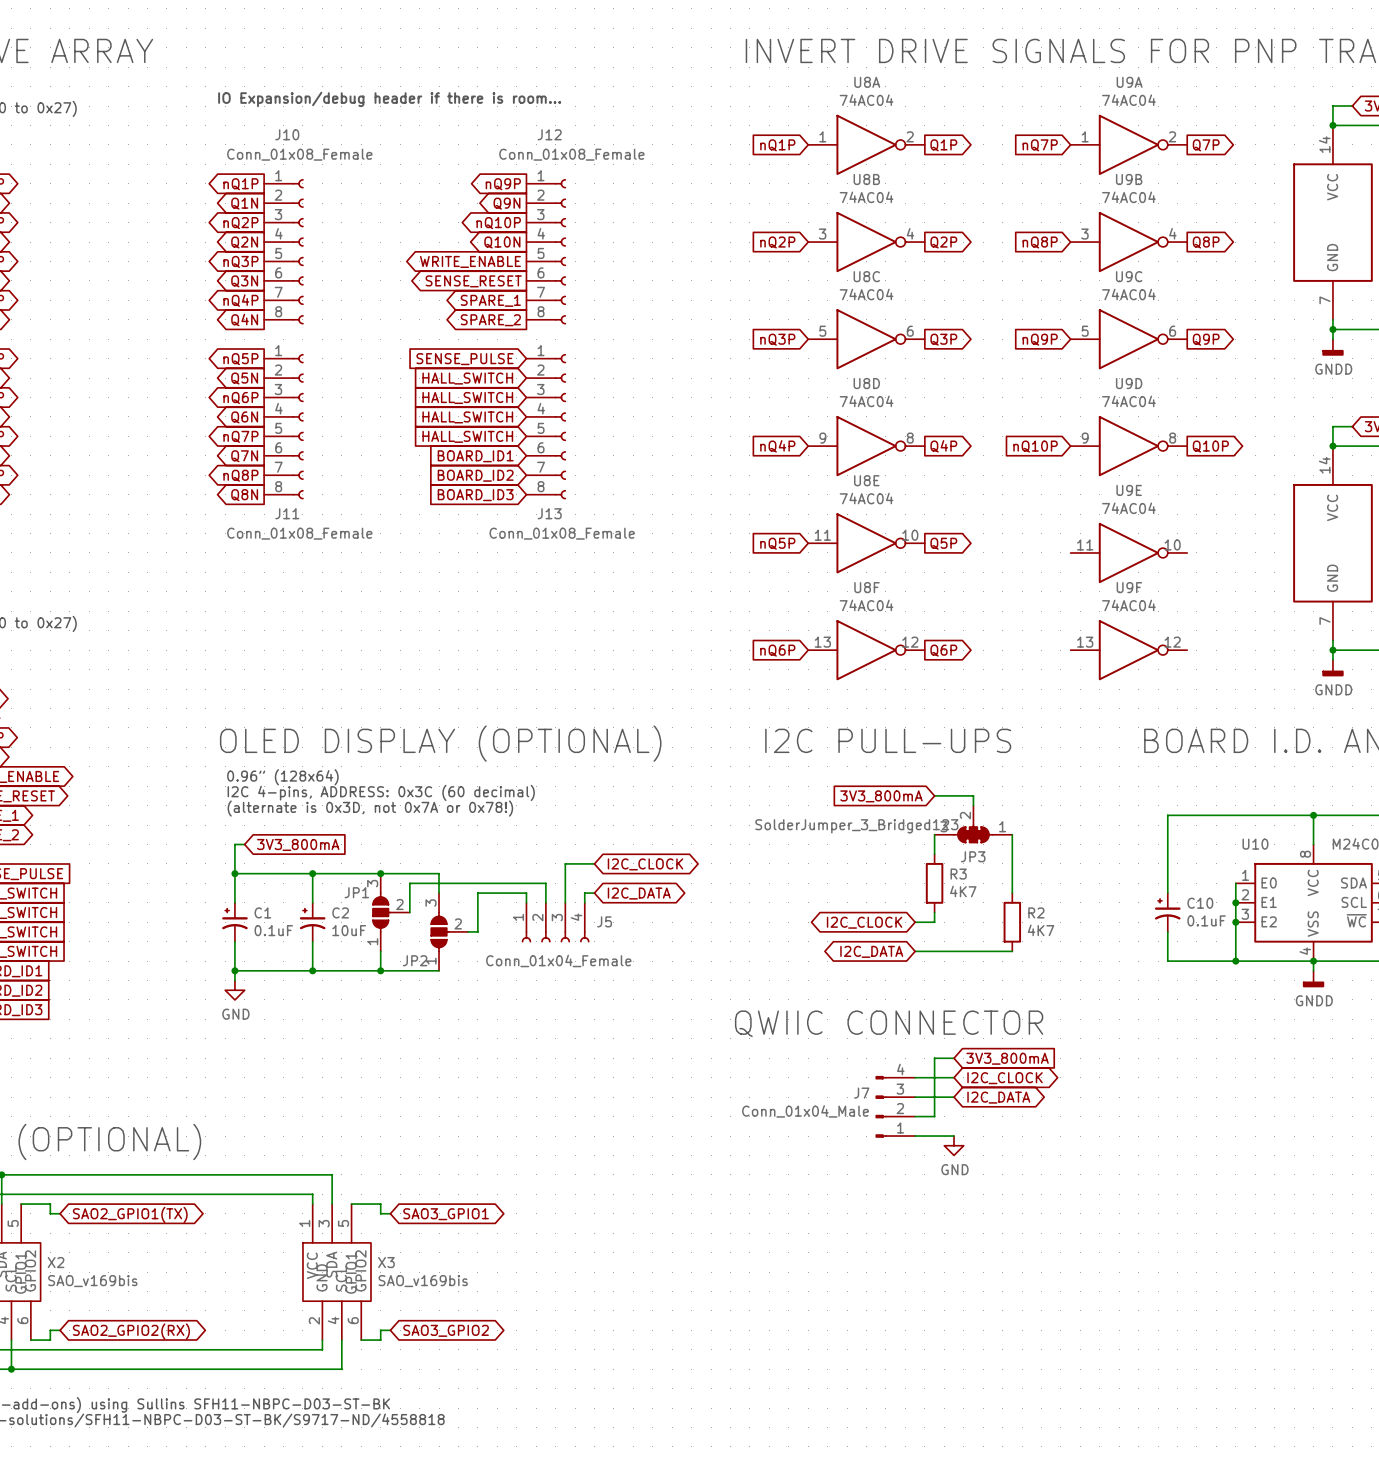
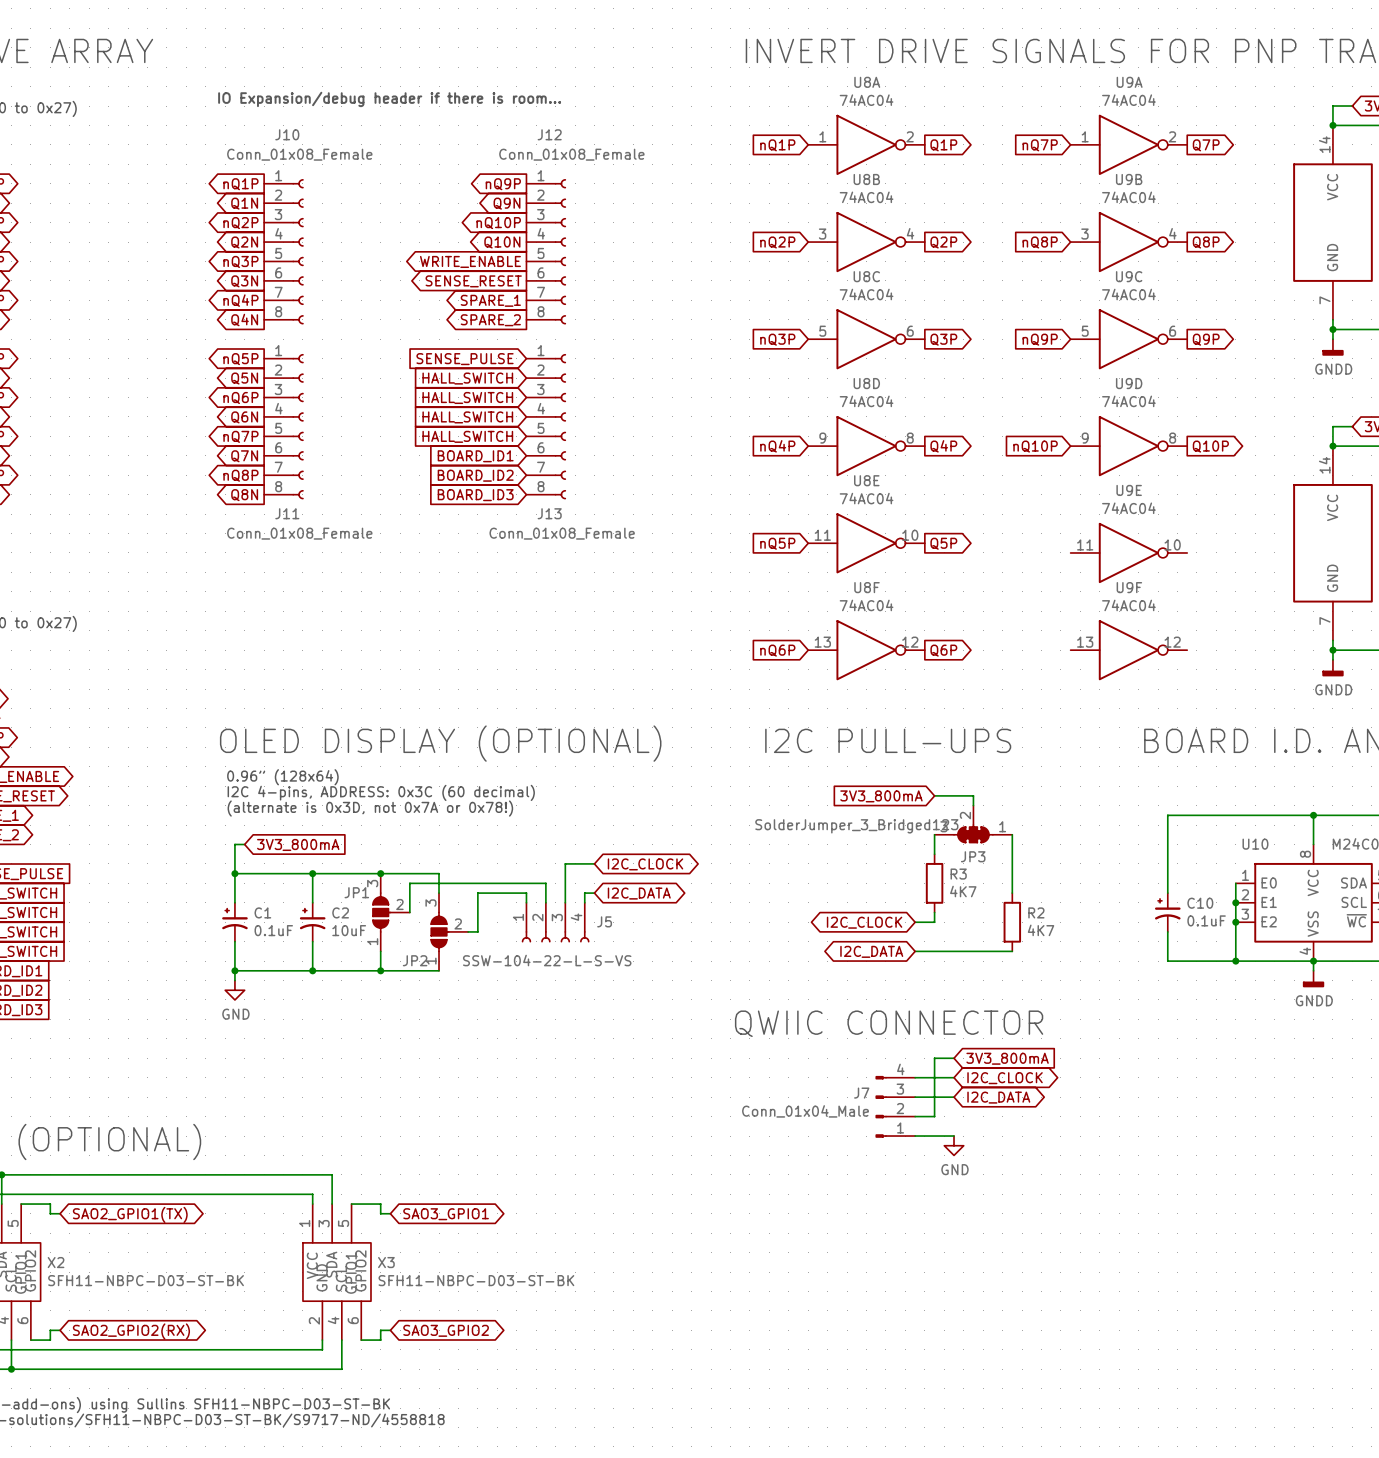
J5 value: Conn_01x04_Female (558, 960) -> SSW-104-22-L-S-VS (547, 960)
X2 value: SAO_v169bis (92, 1281) -> SFH11-NBPC-D03-ST-BK (146, 1280)
X3 value: SAO_v169bis (423, 1281) -> SFH11-NBPC-D03-ST-BK (476, 1280)

